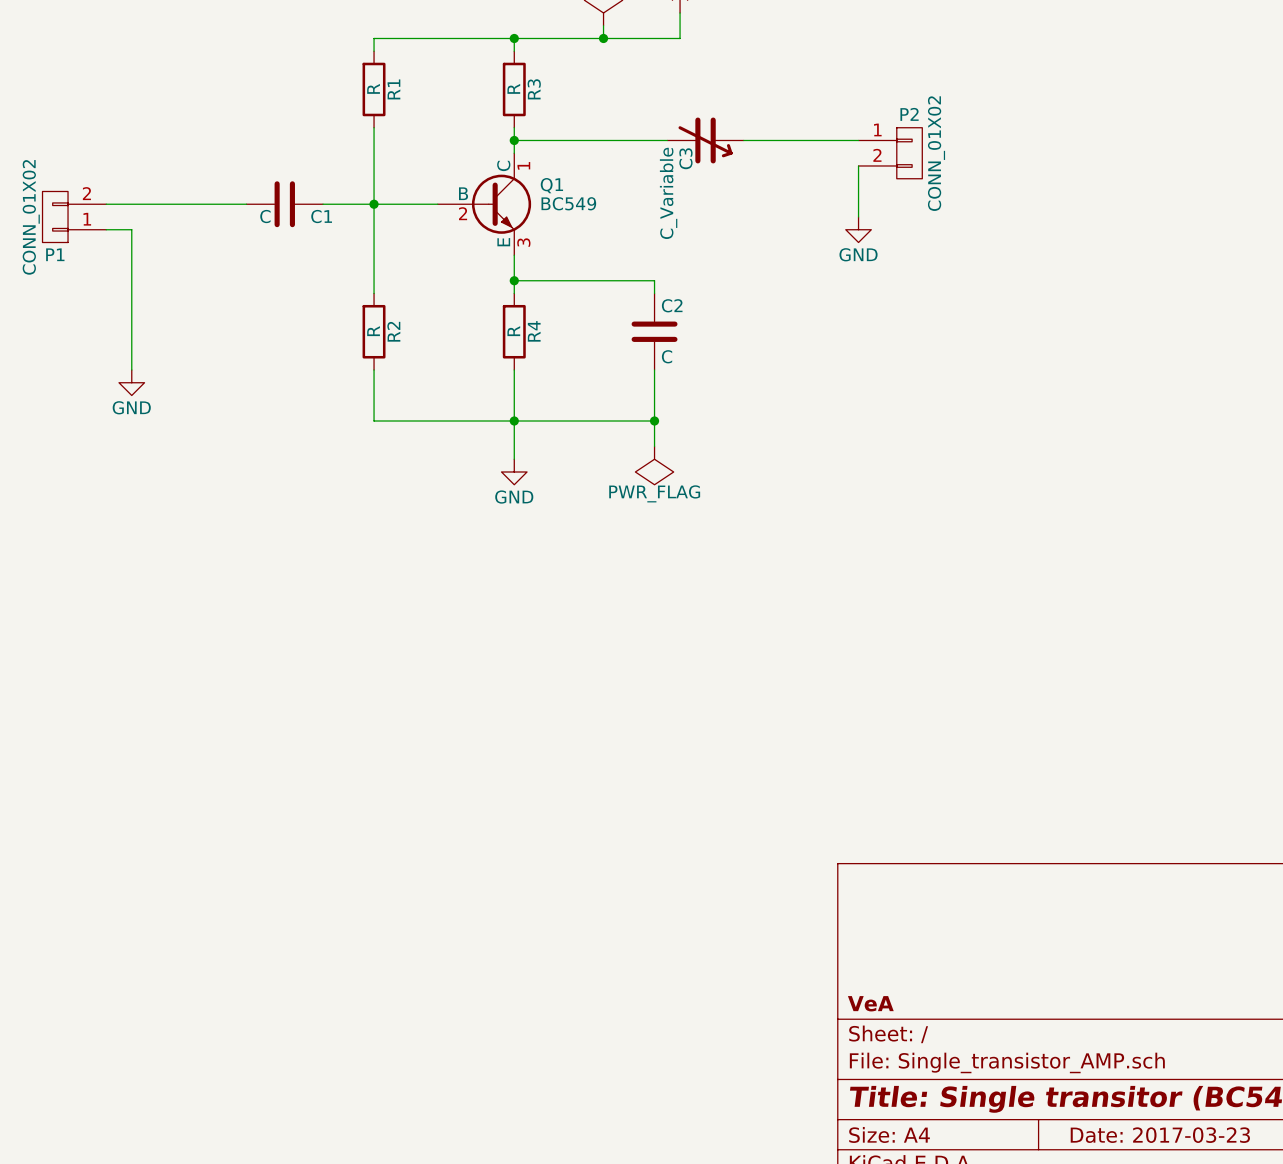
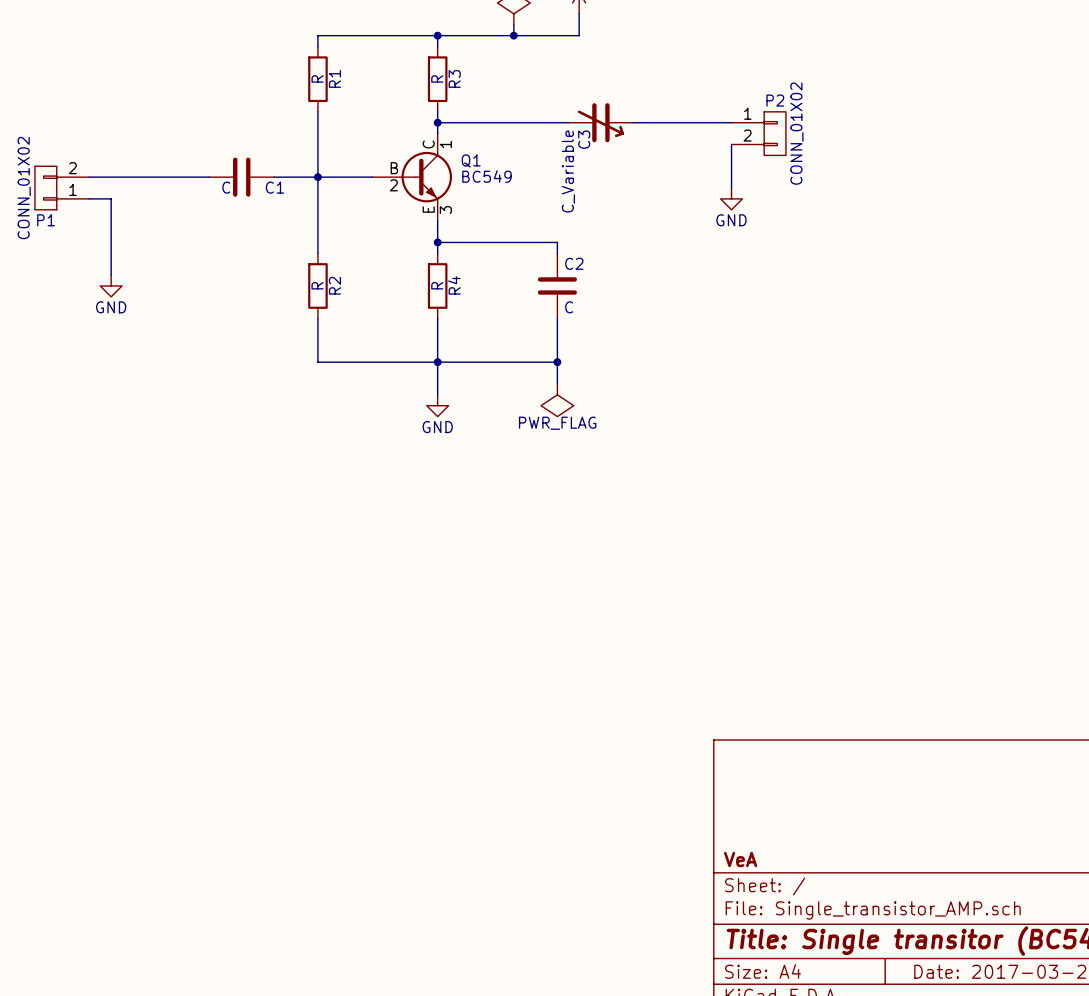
wire: (131, 318) (131, 369) -> none
power symbol position: GND (131, 382) -> GND (111, 285)

